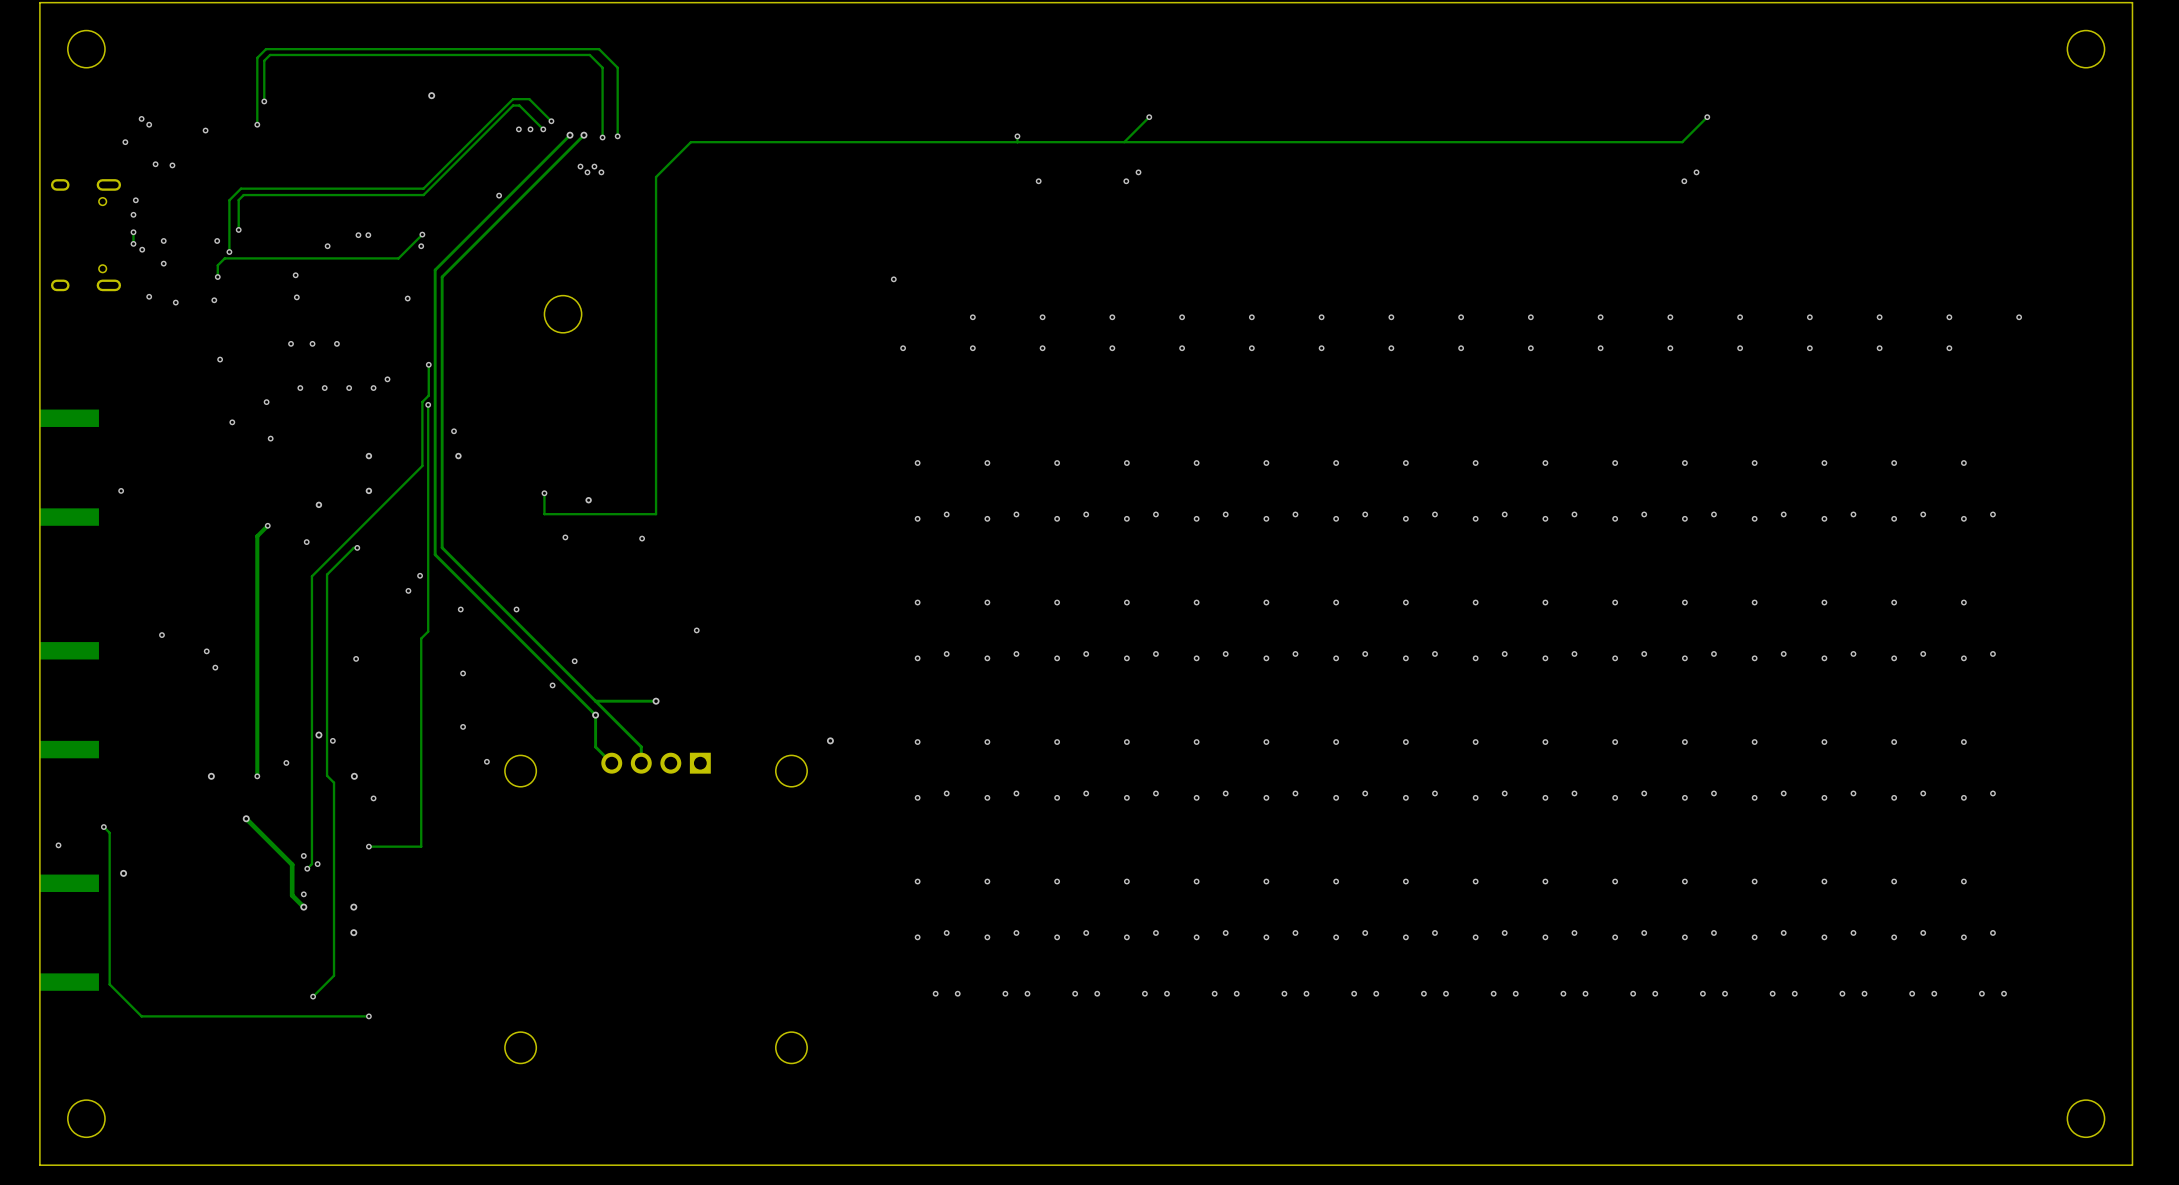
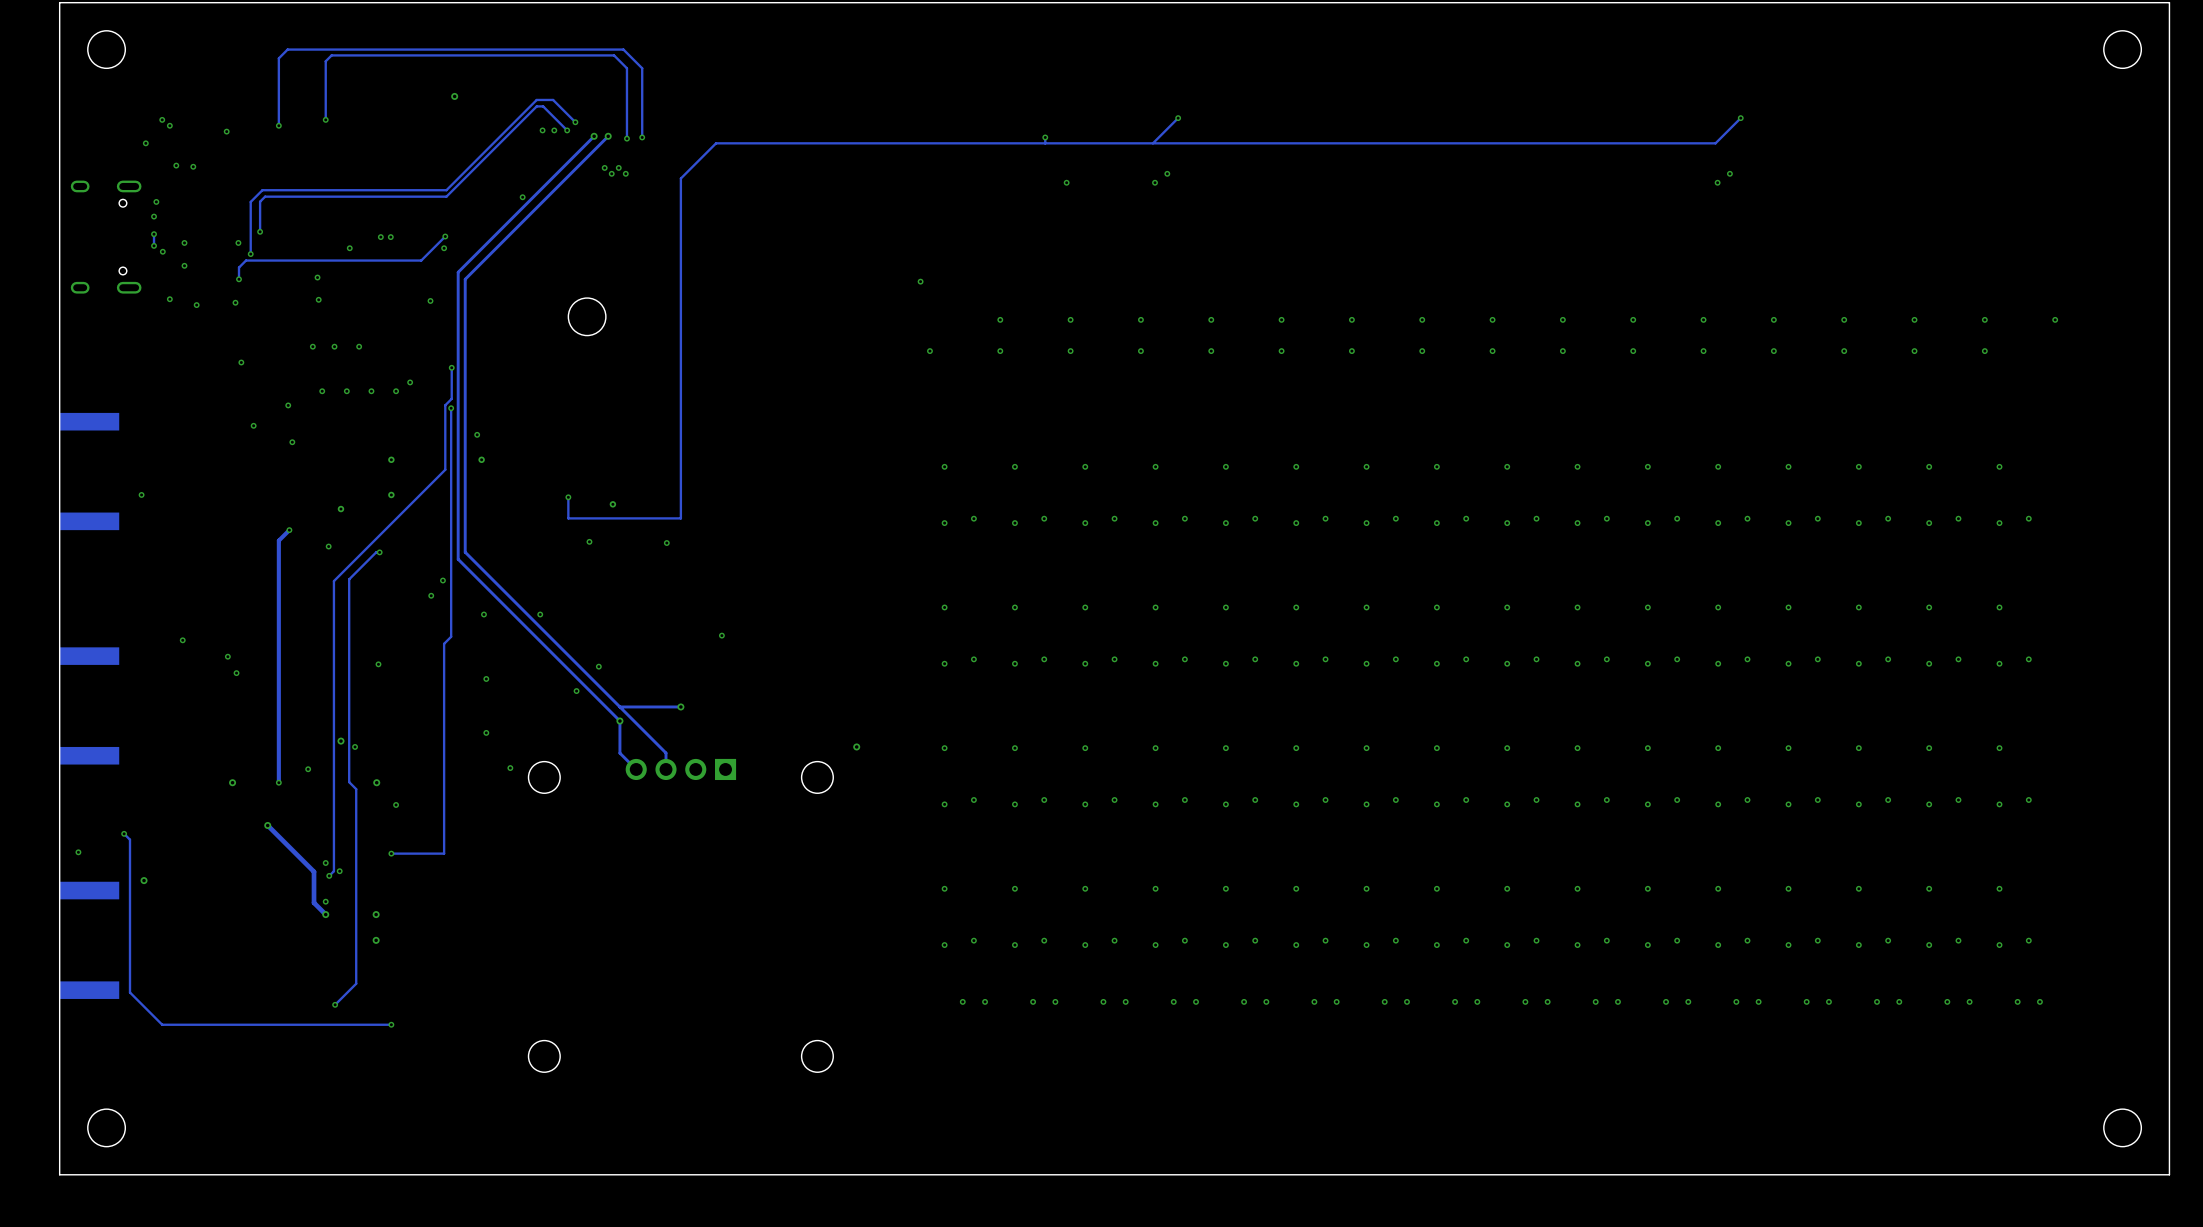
track: (309, 54) (270, 54) (264, 60) (264, 101) -> (331, 55) (325, 61) (325, 119)
via position: (264, 101) -> (325, 119)

